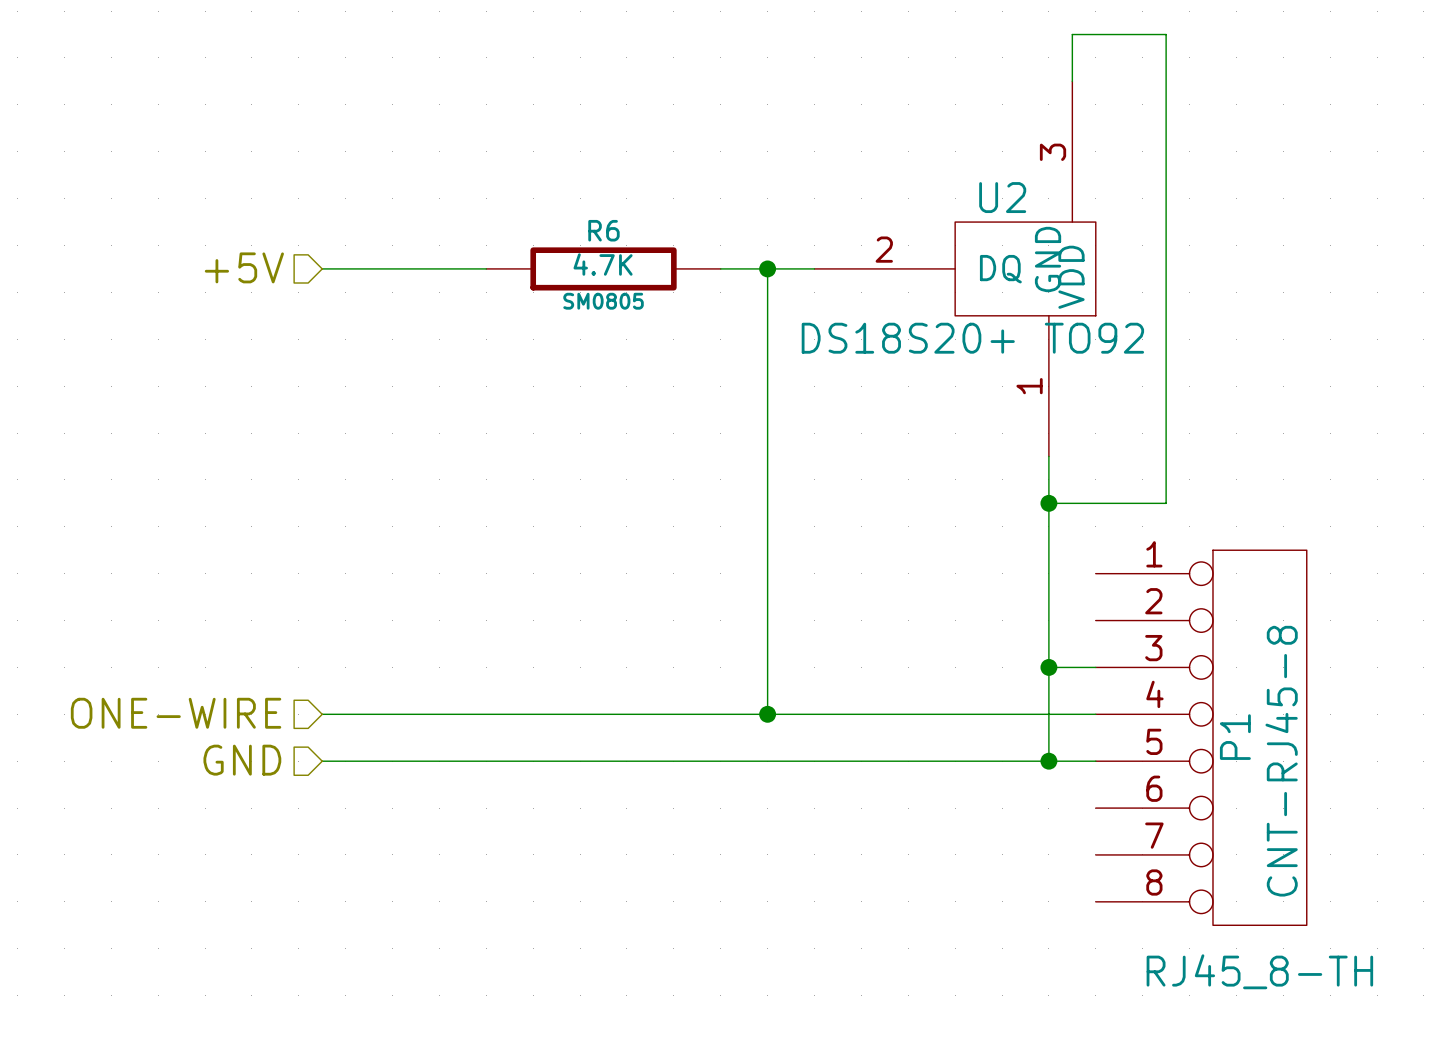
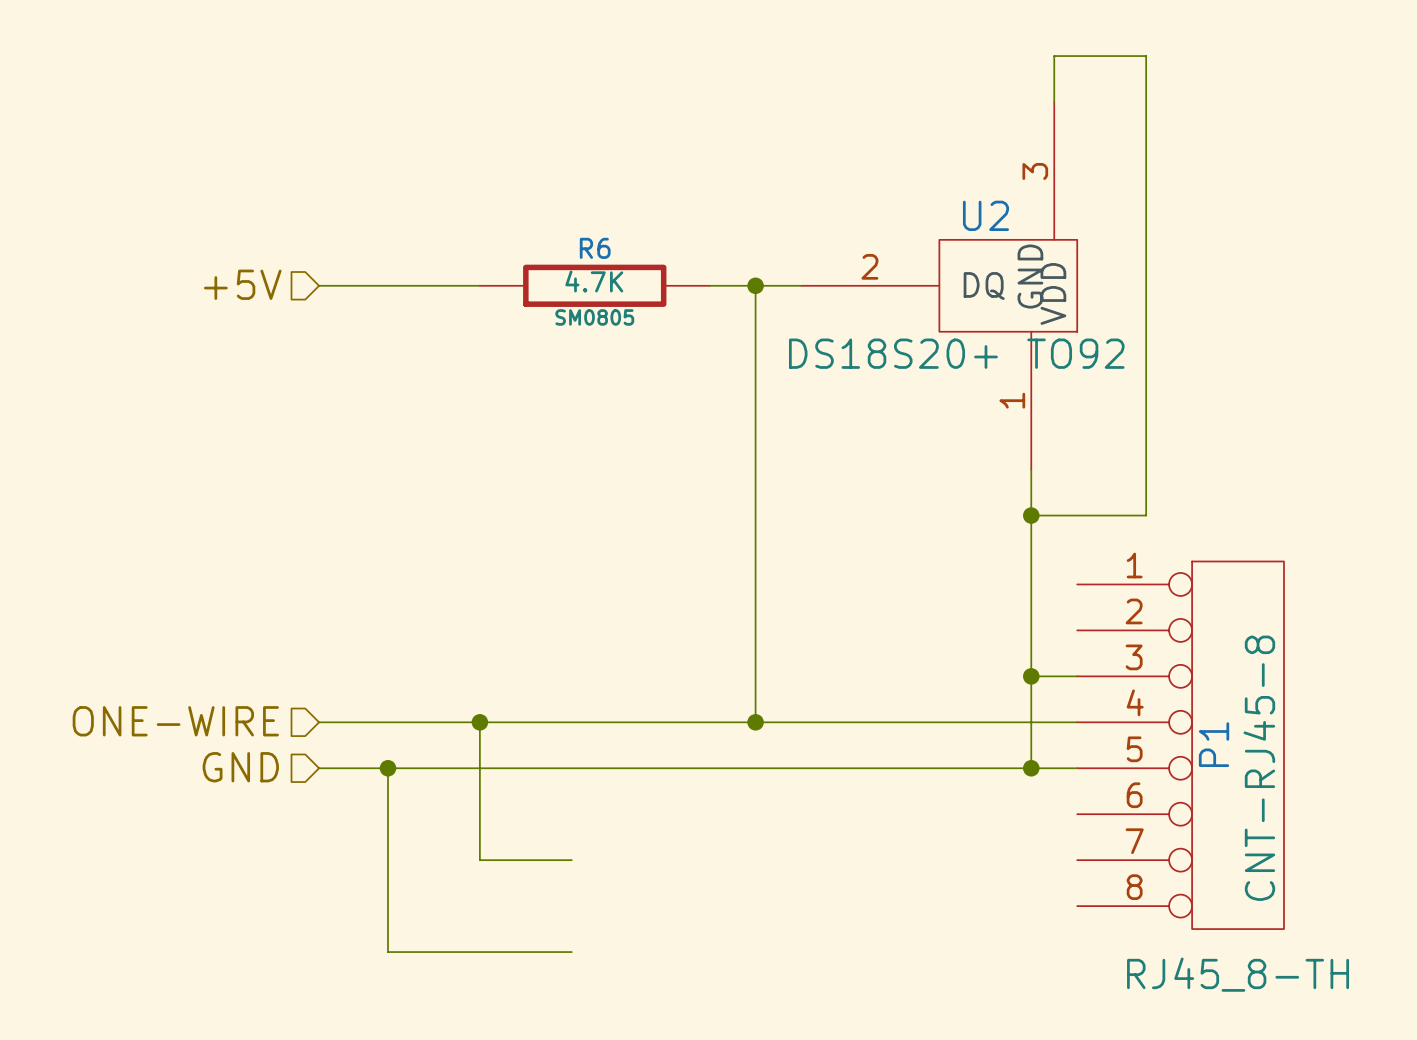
wire: none -> (479, 722) (479, 860) (571, 860)
junction: none -> (479, 722)
wire: none -> (387, 768) (387, 952) (571, 952)
junction: none -> (387, 768)

